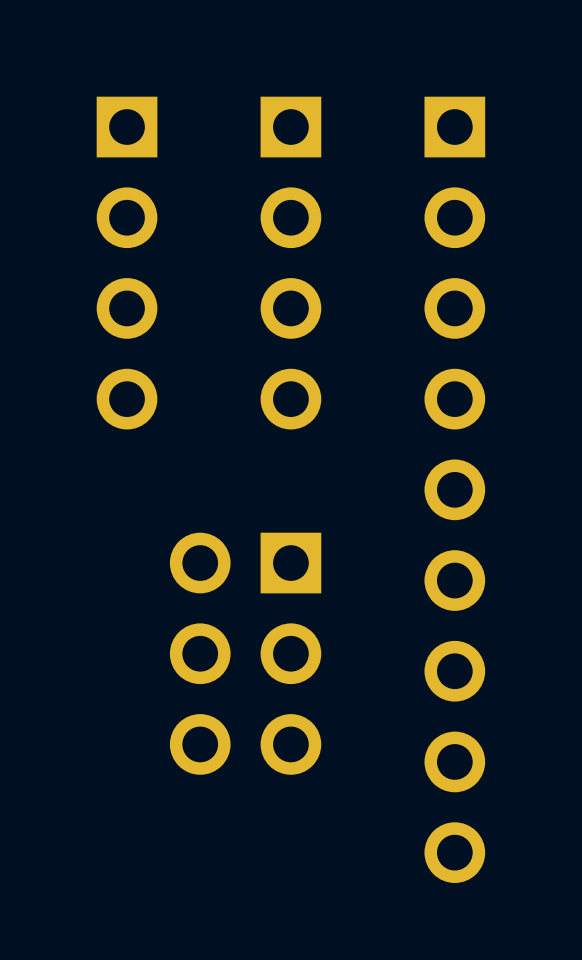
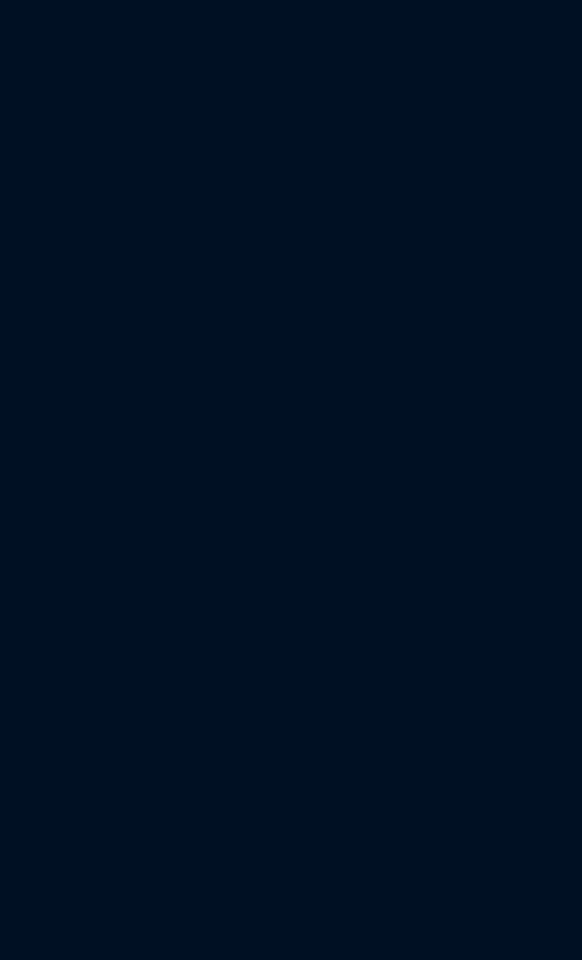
part: (127, 263) -> none
part: (290, 263) -> none
part: (454, 489) -> none
part: (245, 653) -> none

